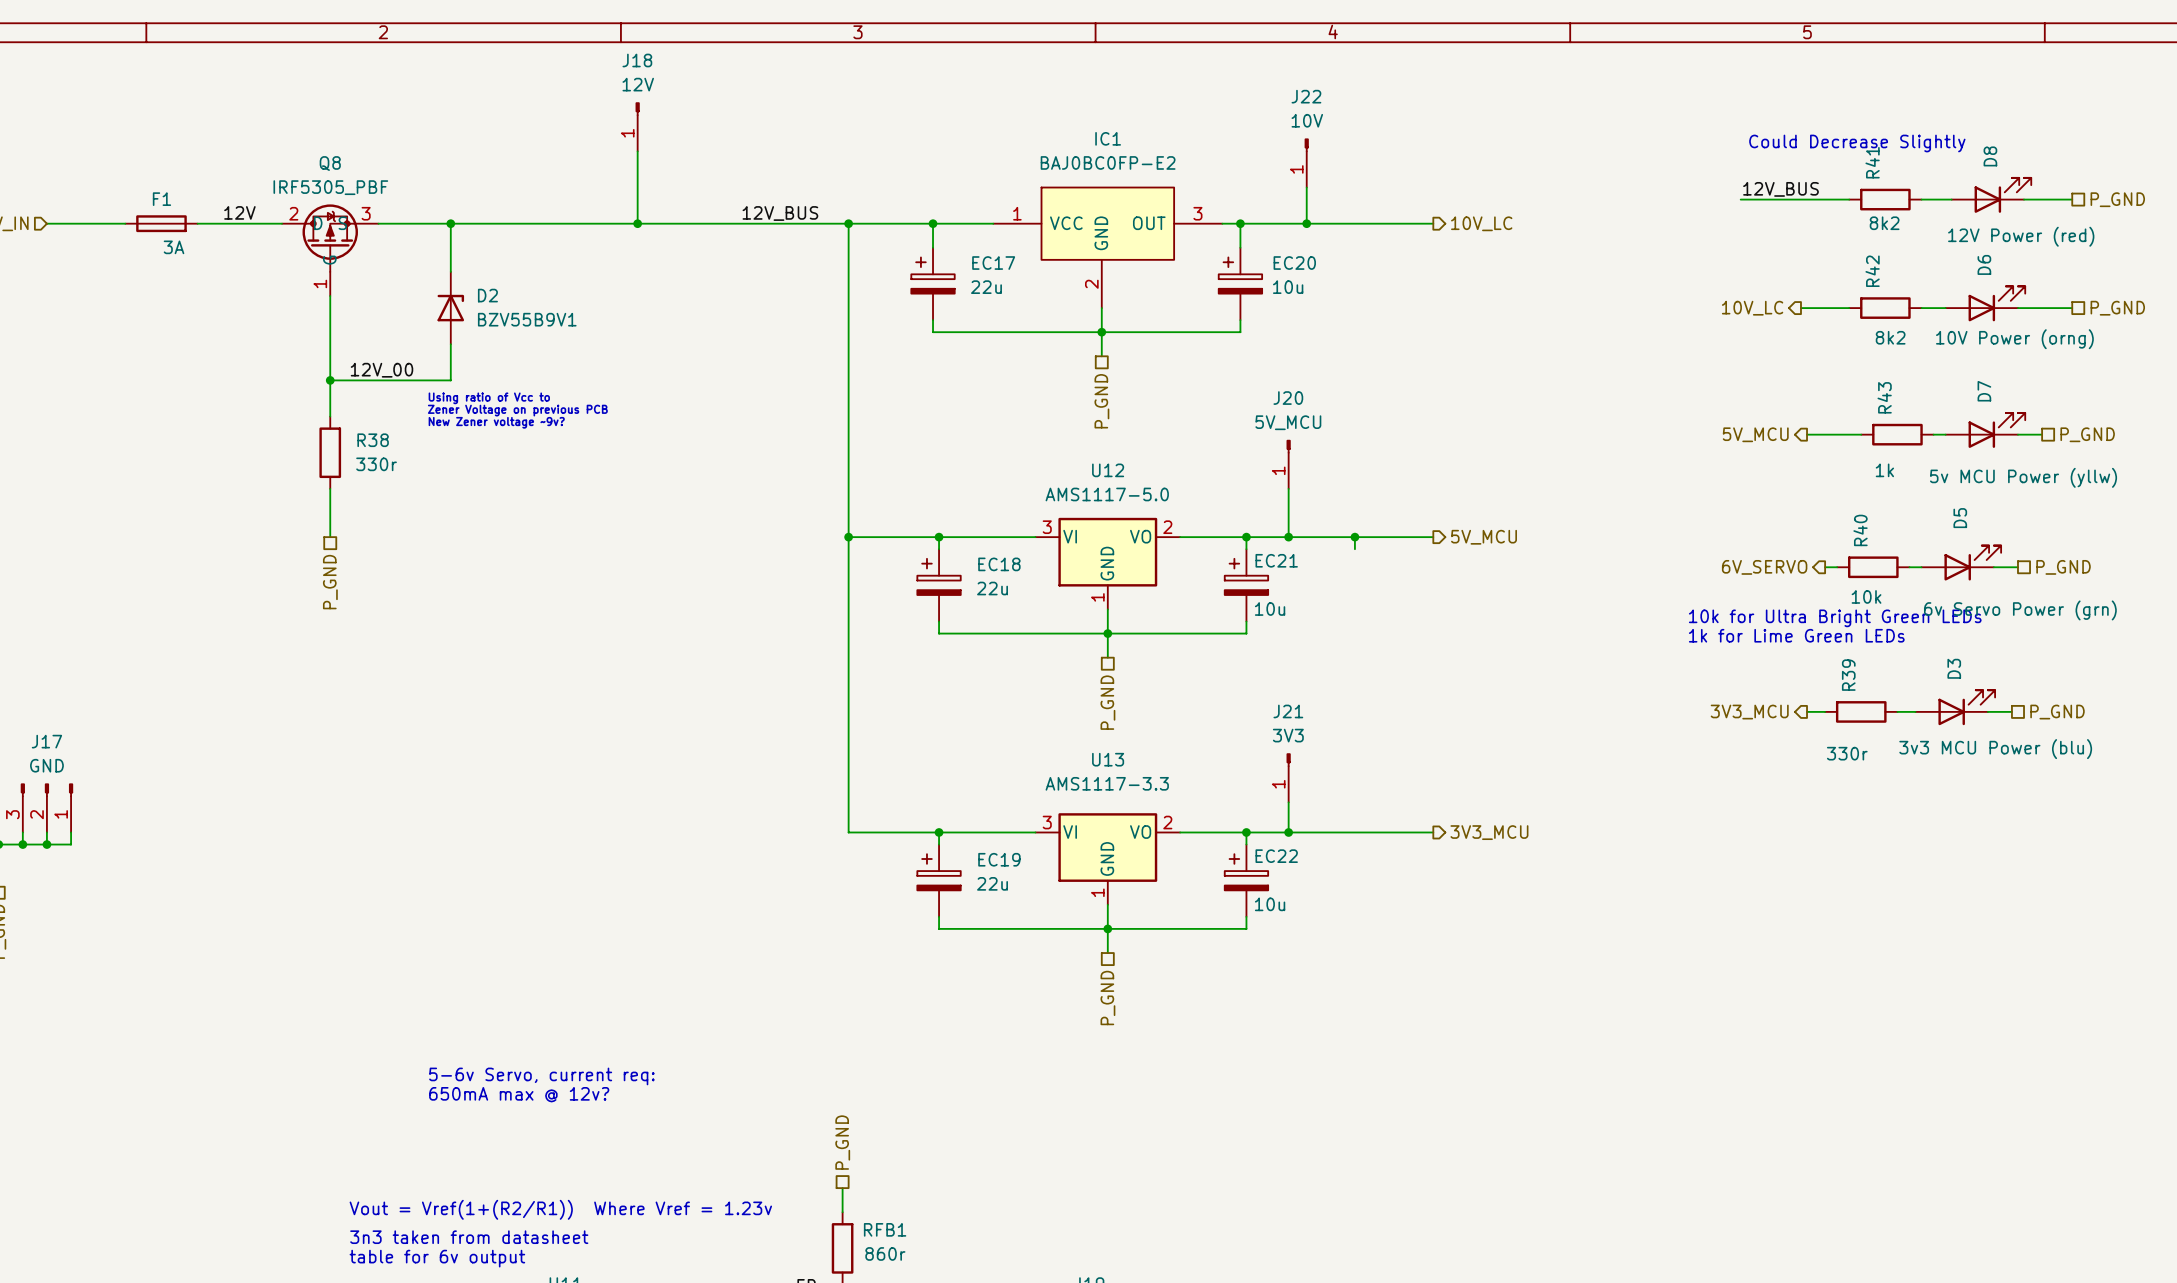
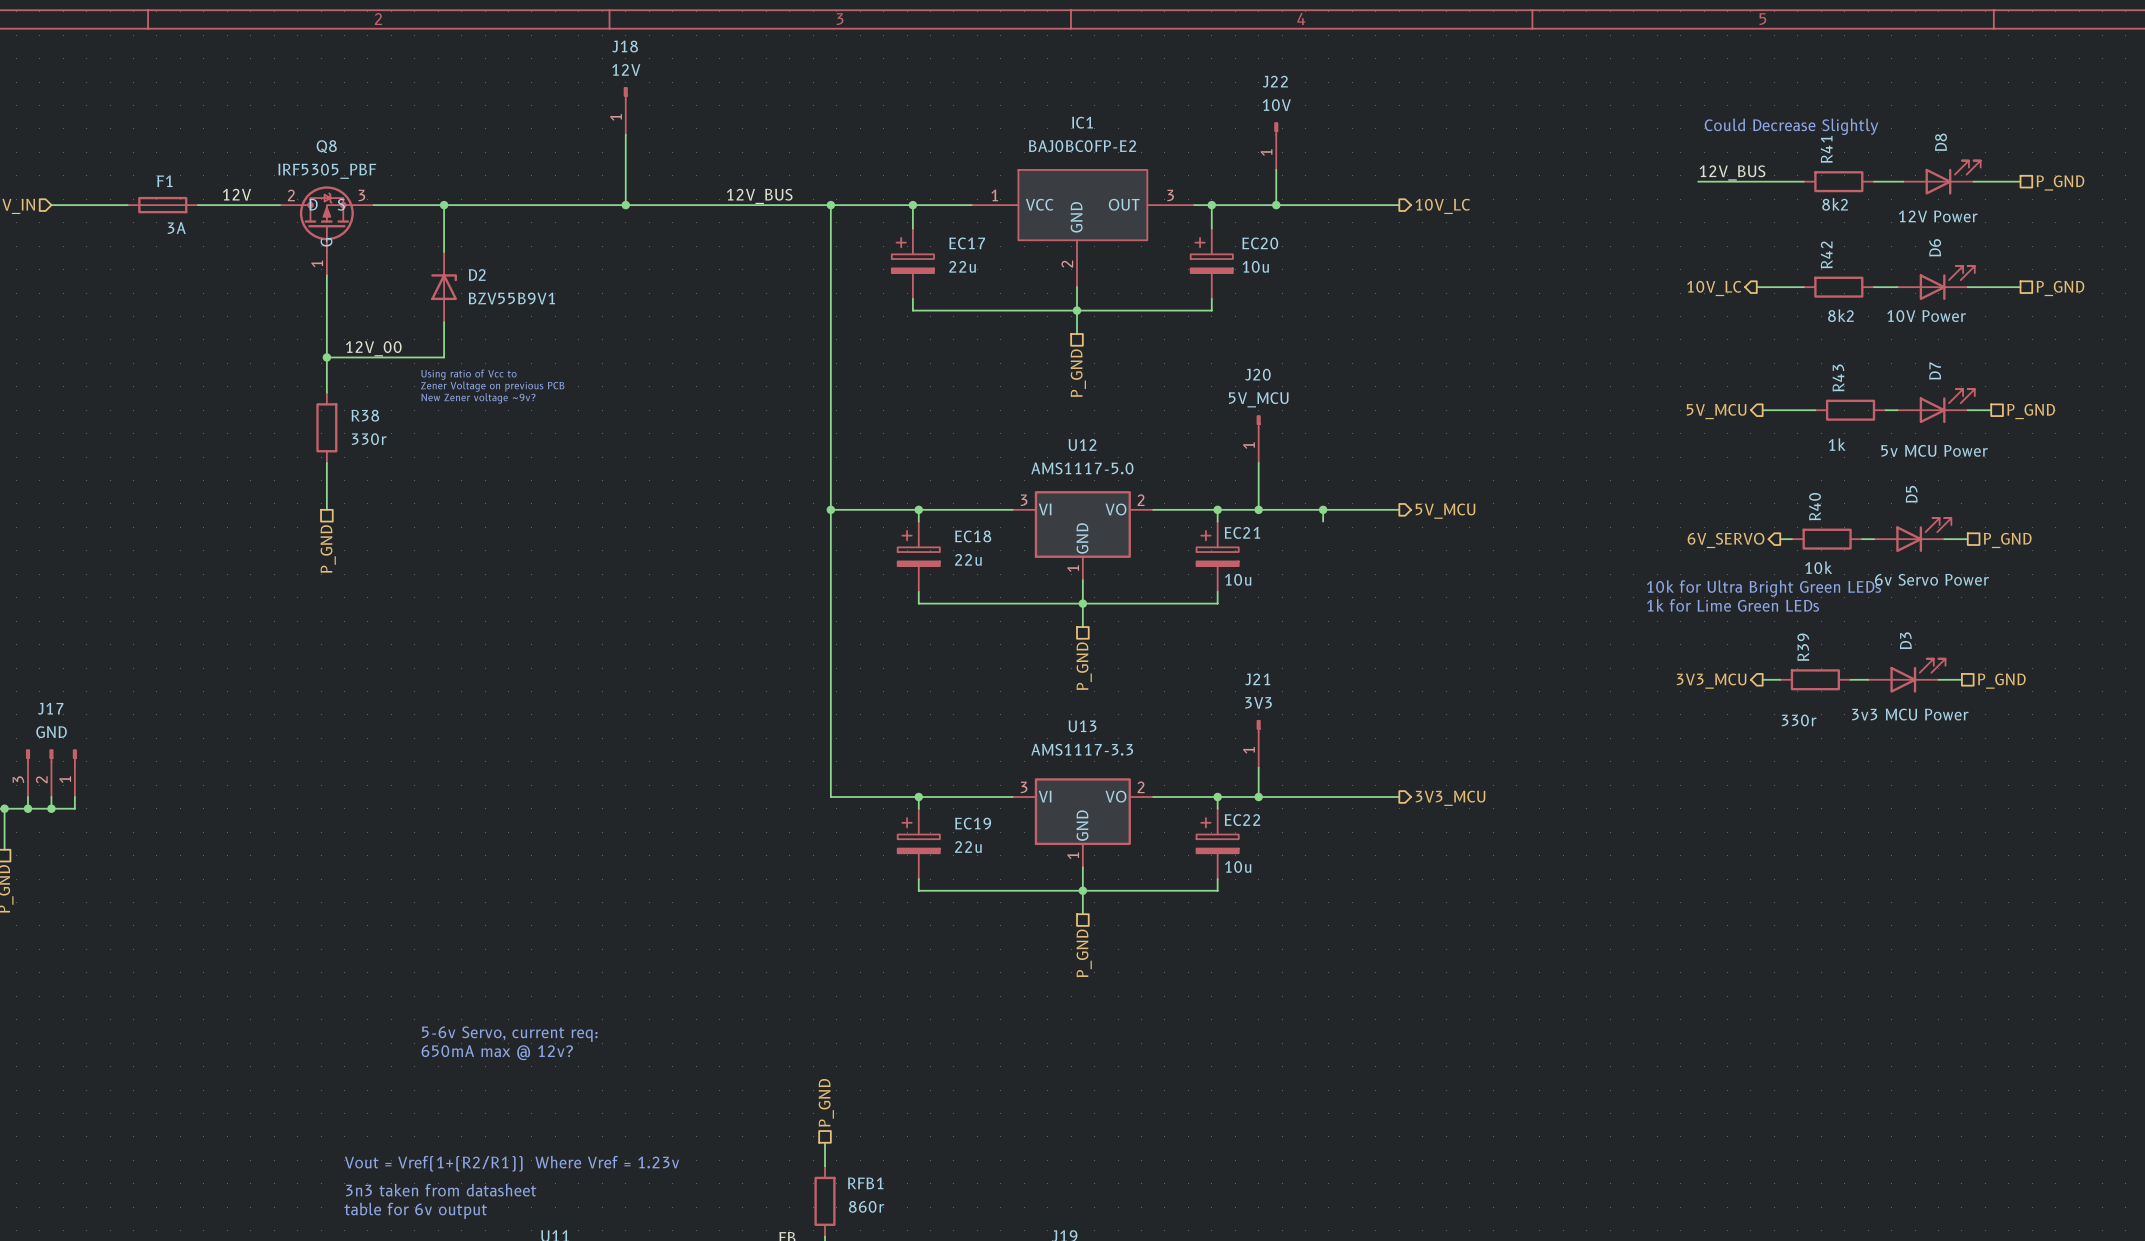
D8 value: 12V Power (red) (2021, 236) -> 12V Power (1938, 216)
D6 value: 10V Power (orng) (2014, 339) -> 10V Power (1926, 316)
D7 value: 5v MCU Power (yllw) (2023, 477) -> 5v MCU Power (1934, 450)
D5 value: 6v Servo Power (grn) (2020, 610) -> 6v Servo Power (1931, 579)
D3 value: 3v3 MCU Power (blu) (1995, 749) -> 3v3 MCU Power (1910, 714)

